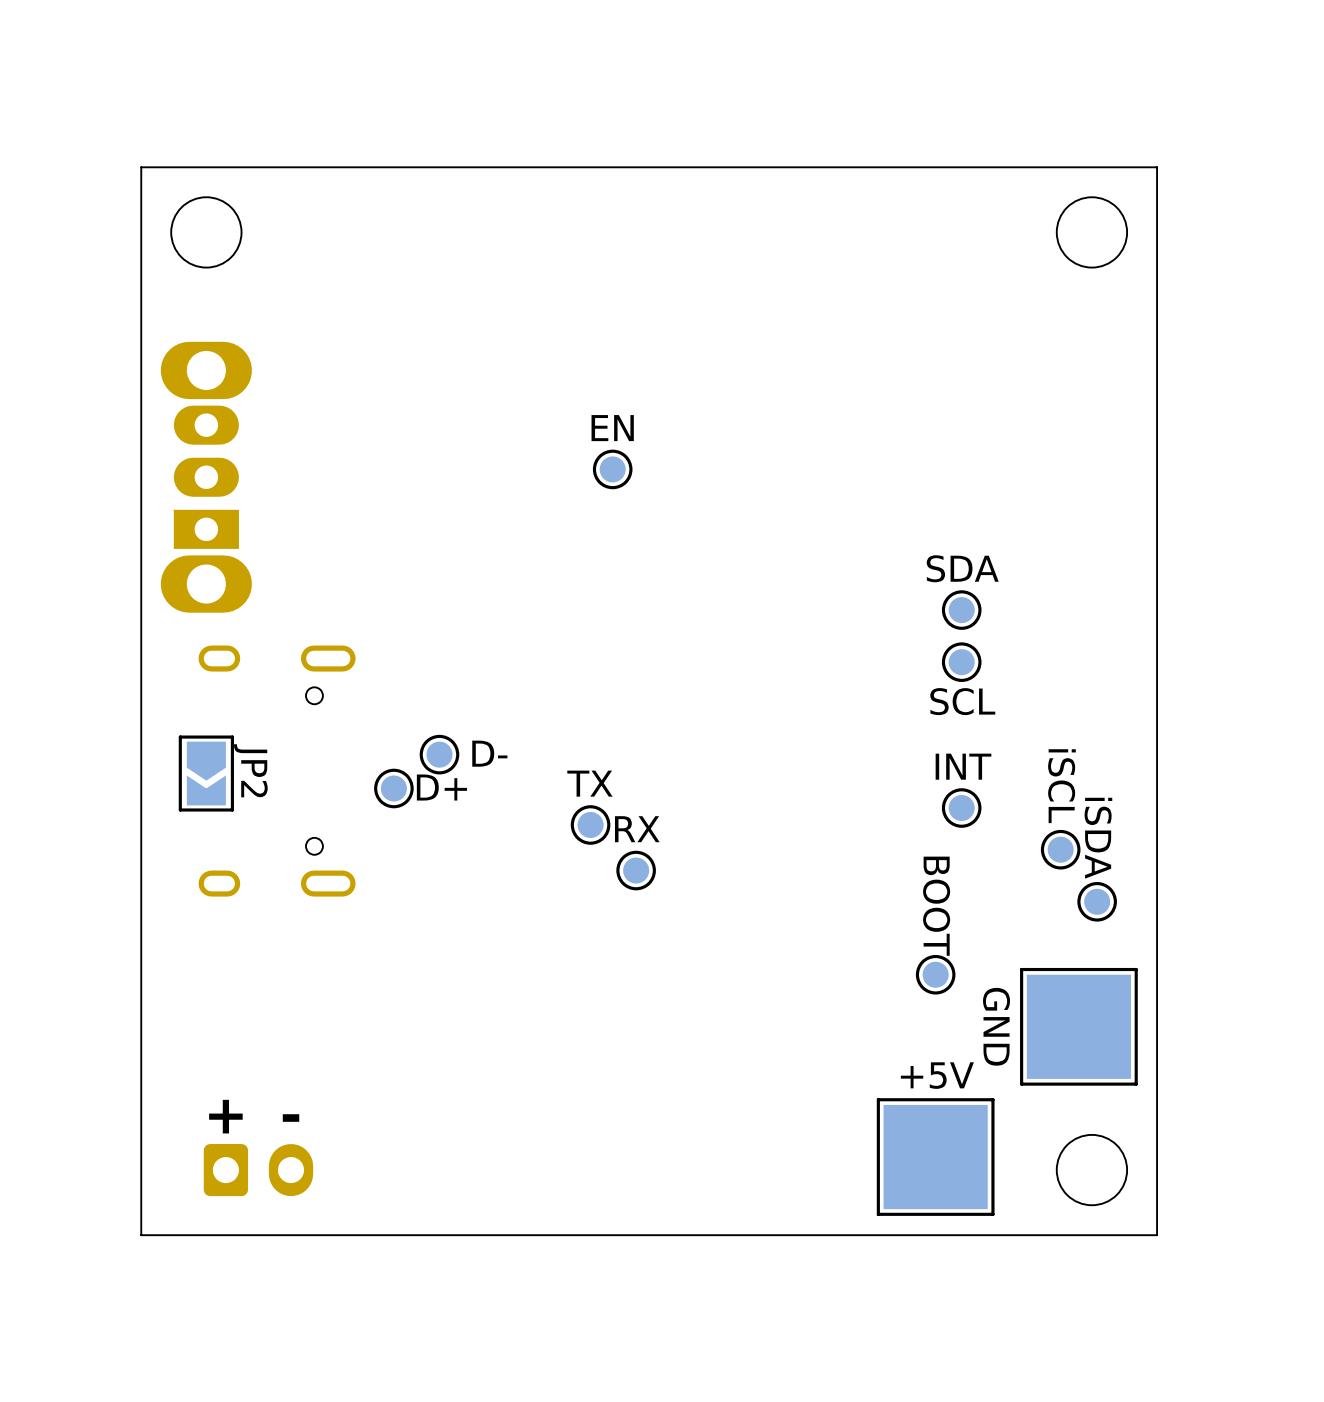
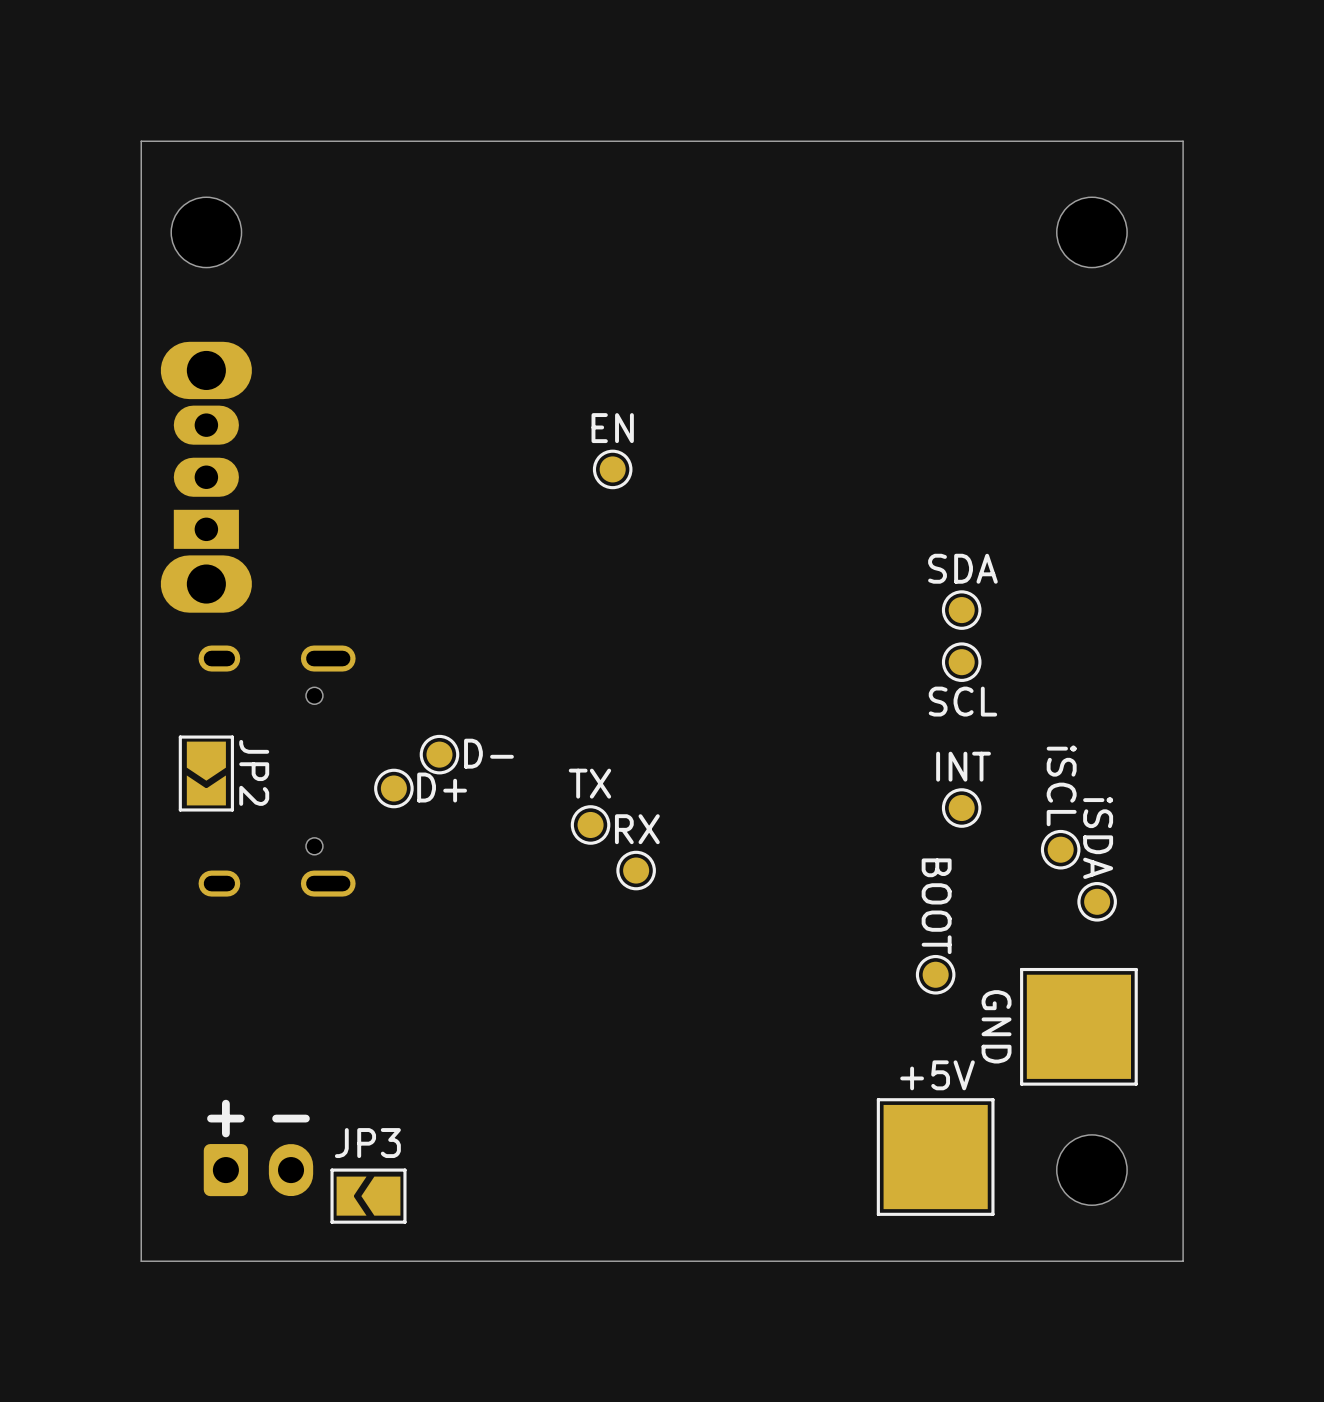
board edge: (141, 167) (1157, 167) (1157, 1235) (141, 1235) -> (141, 167) (141, 141) (1183, 141) (1183, 1261) (141, 1261) (141, 1235)
JP3: none -> (368, 1196)

